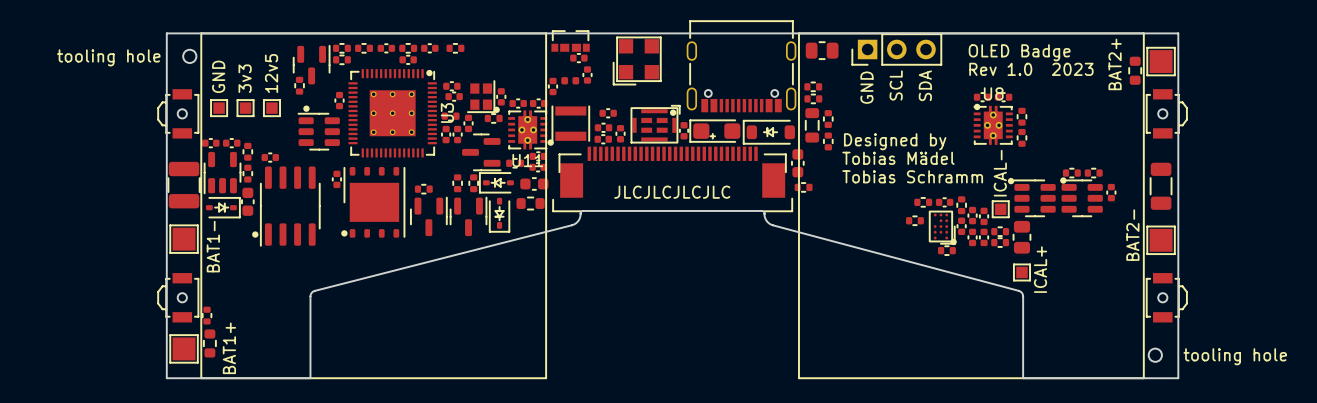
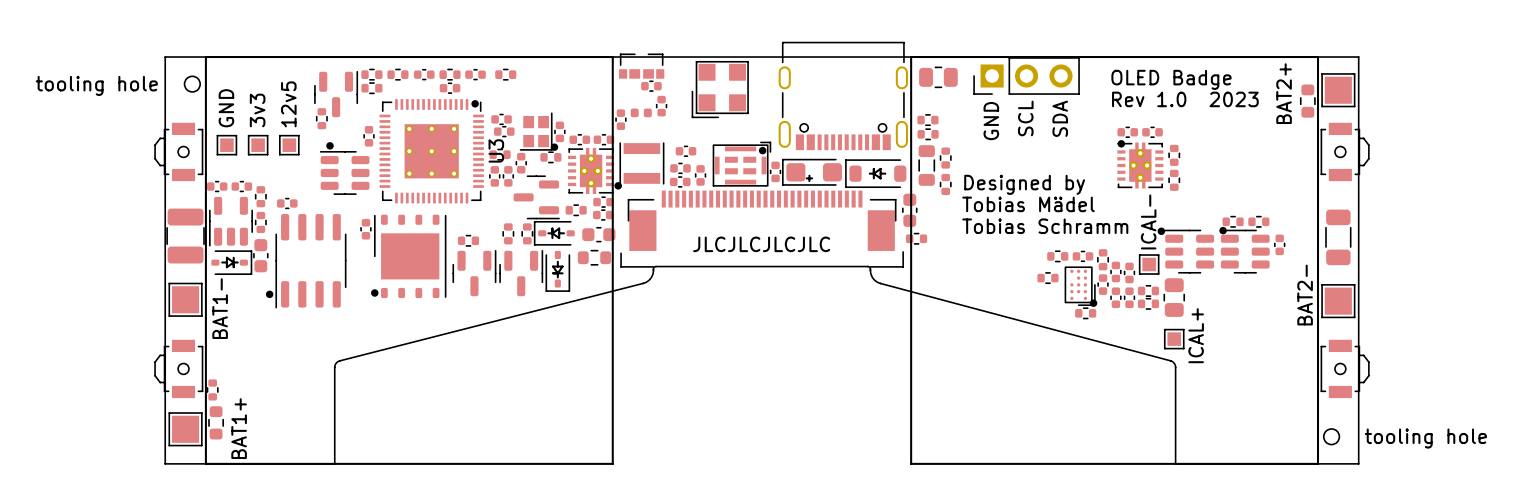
U8 name: U8 (993, 93) -> none
U11 name: U11 (527, 160) -> none

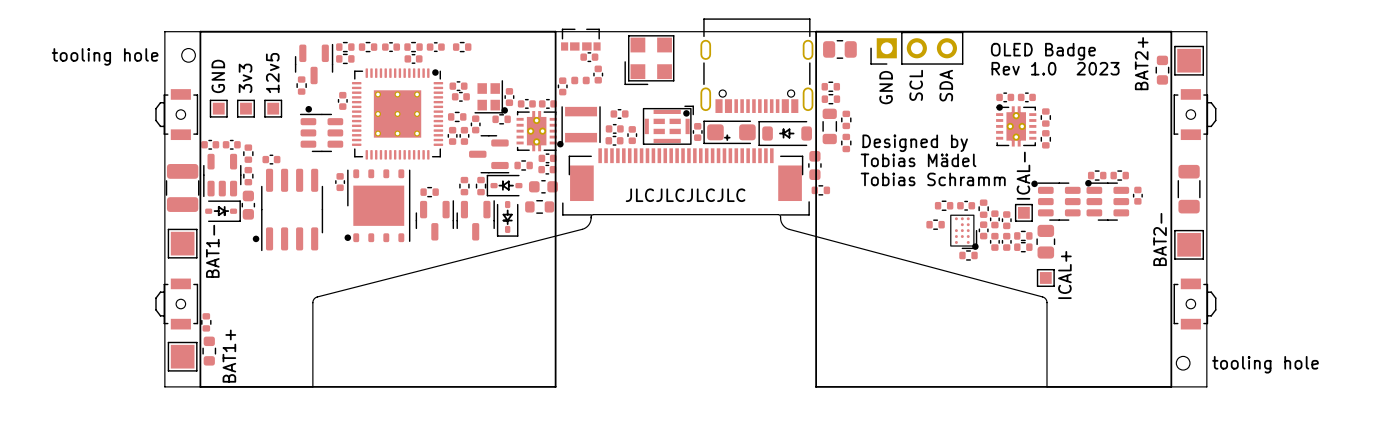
U3 name: U3 (496, 150) -> none

